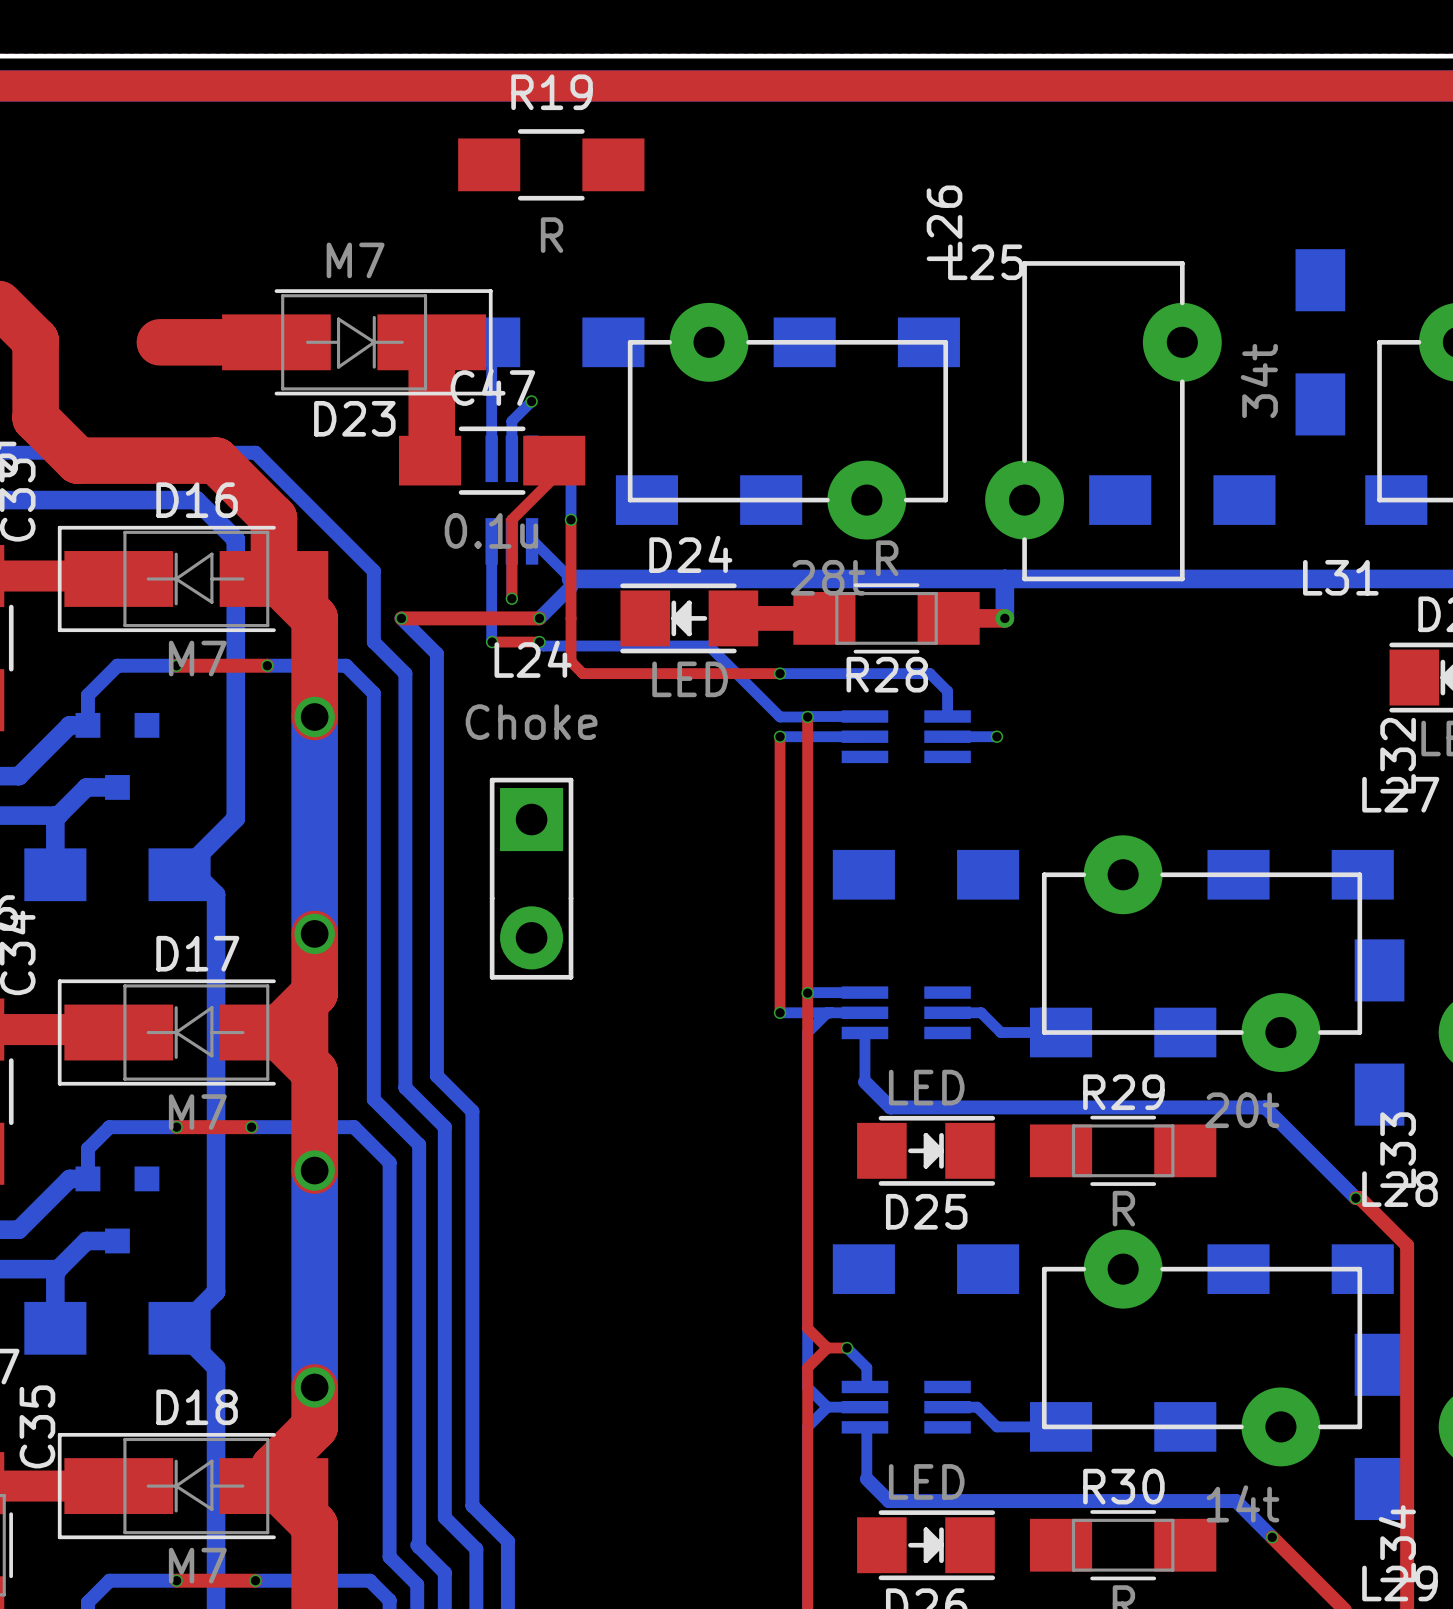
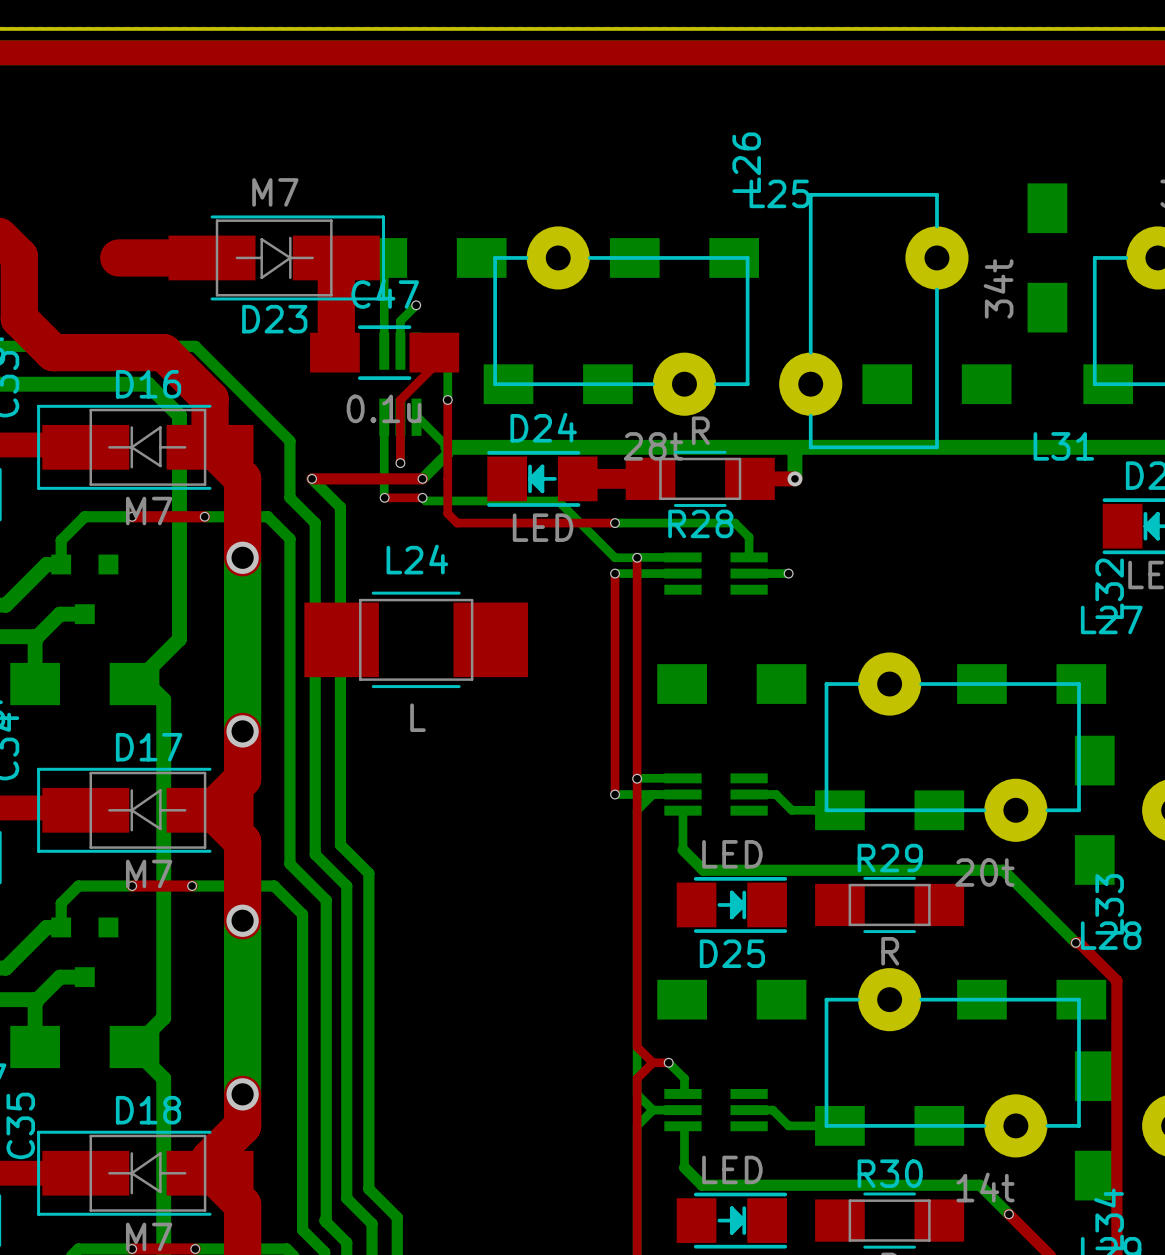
R19: R (551, 164) -> none
L24 name position: L24 (533, 659) -> L24 (417, 559)
L24 value: Choke (531, 722) -> L (417, 717)
L24 footprint: [489, 777, 574, 980] -> [304, 591, 529, 689]

